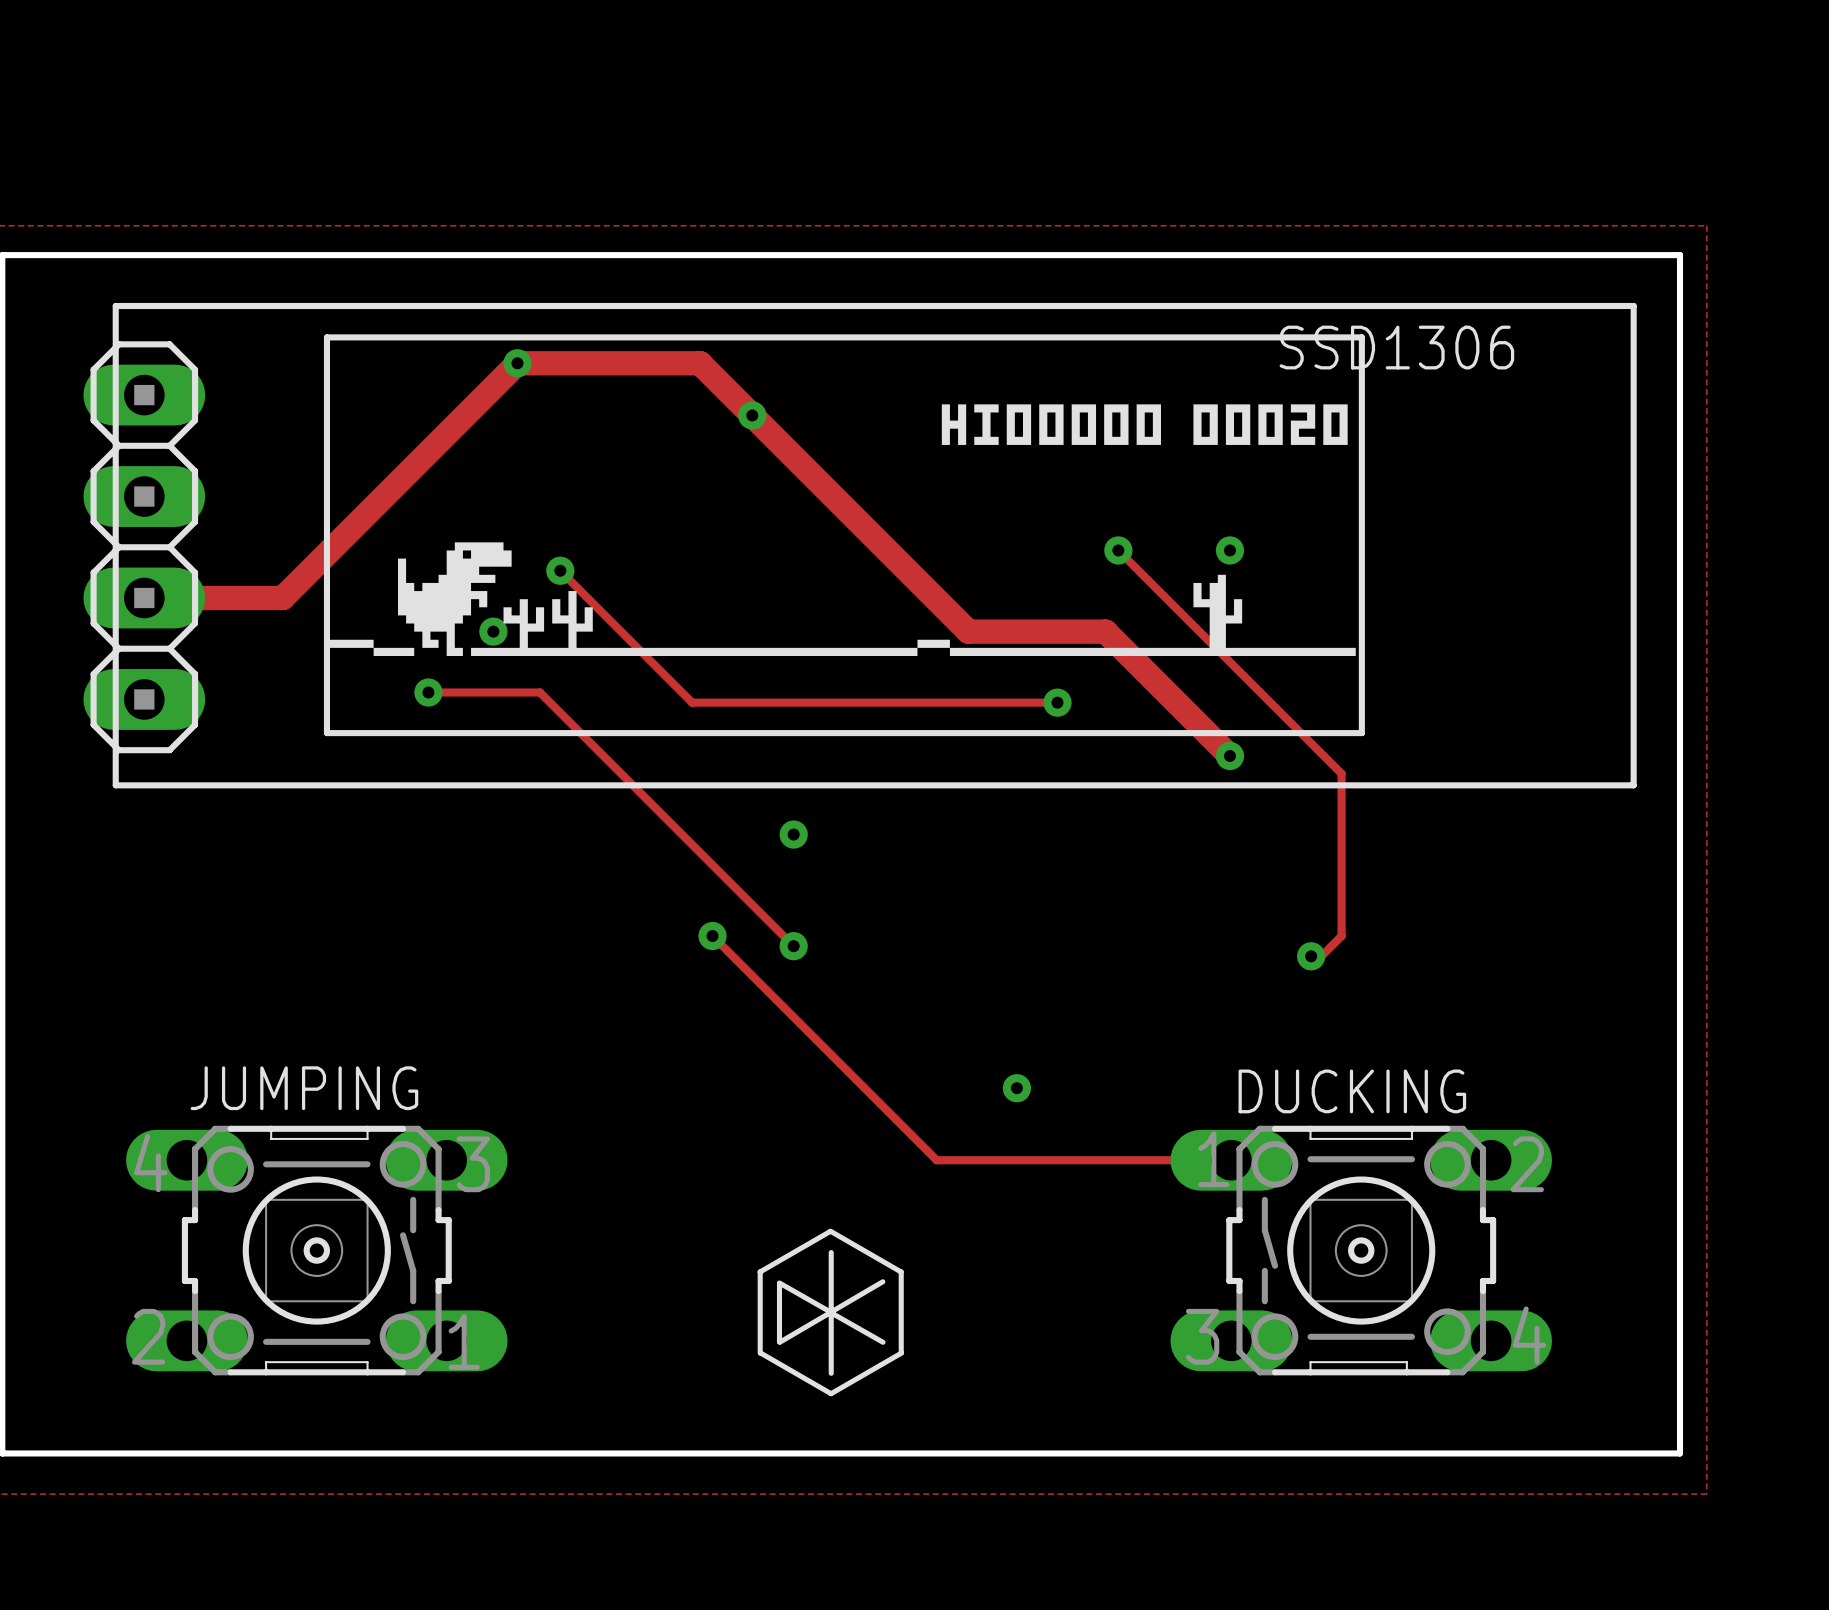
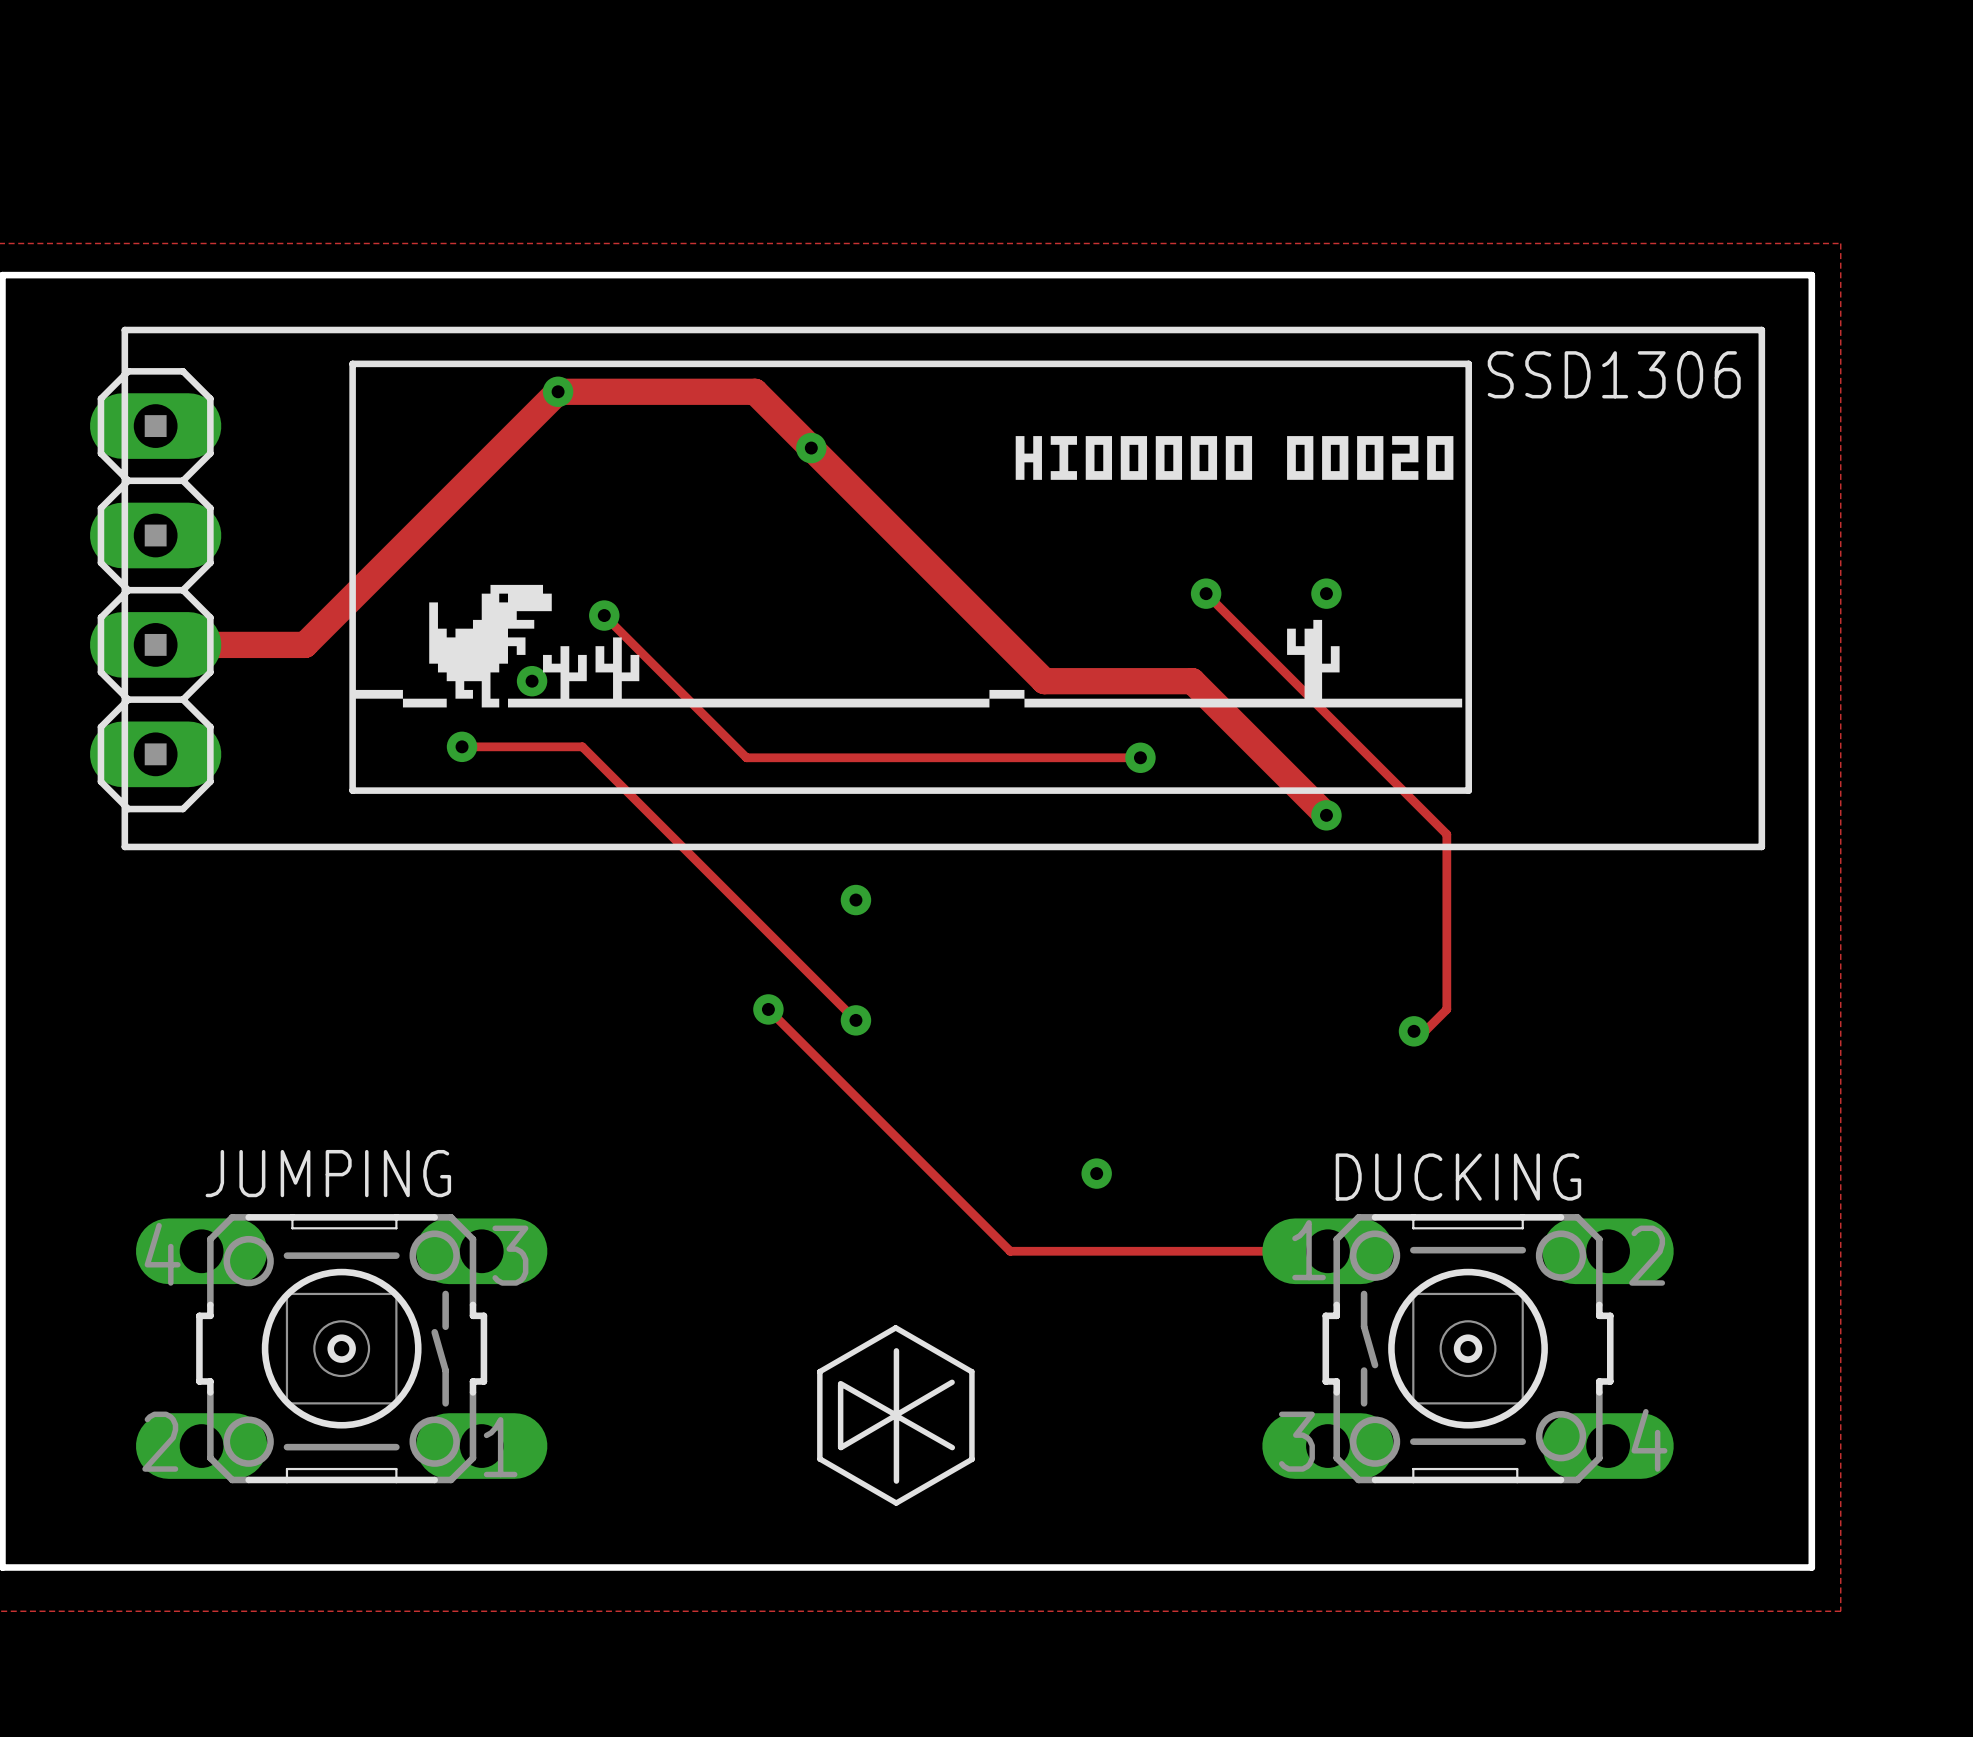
SSD1306 name position: SSD1306 (1396, 347) -> SSD1306 (1614, 374)

